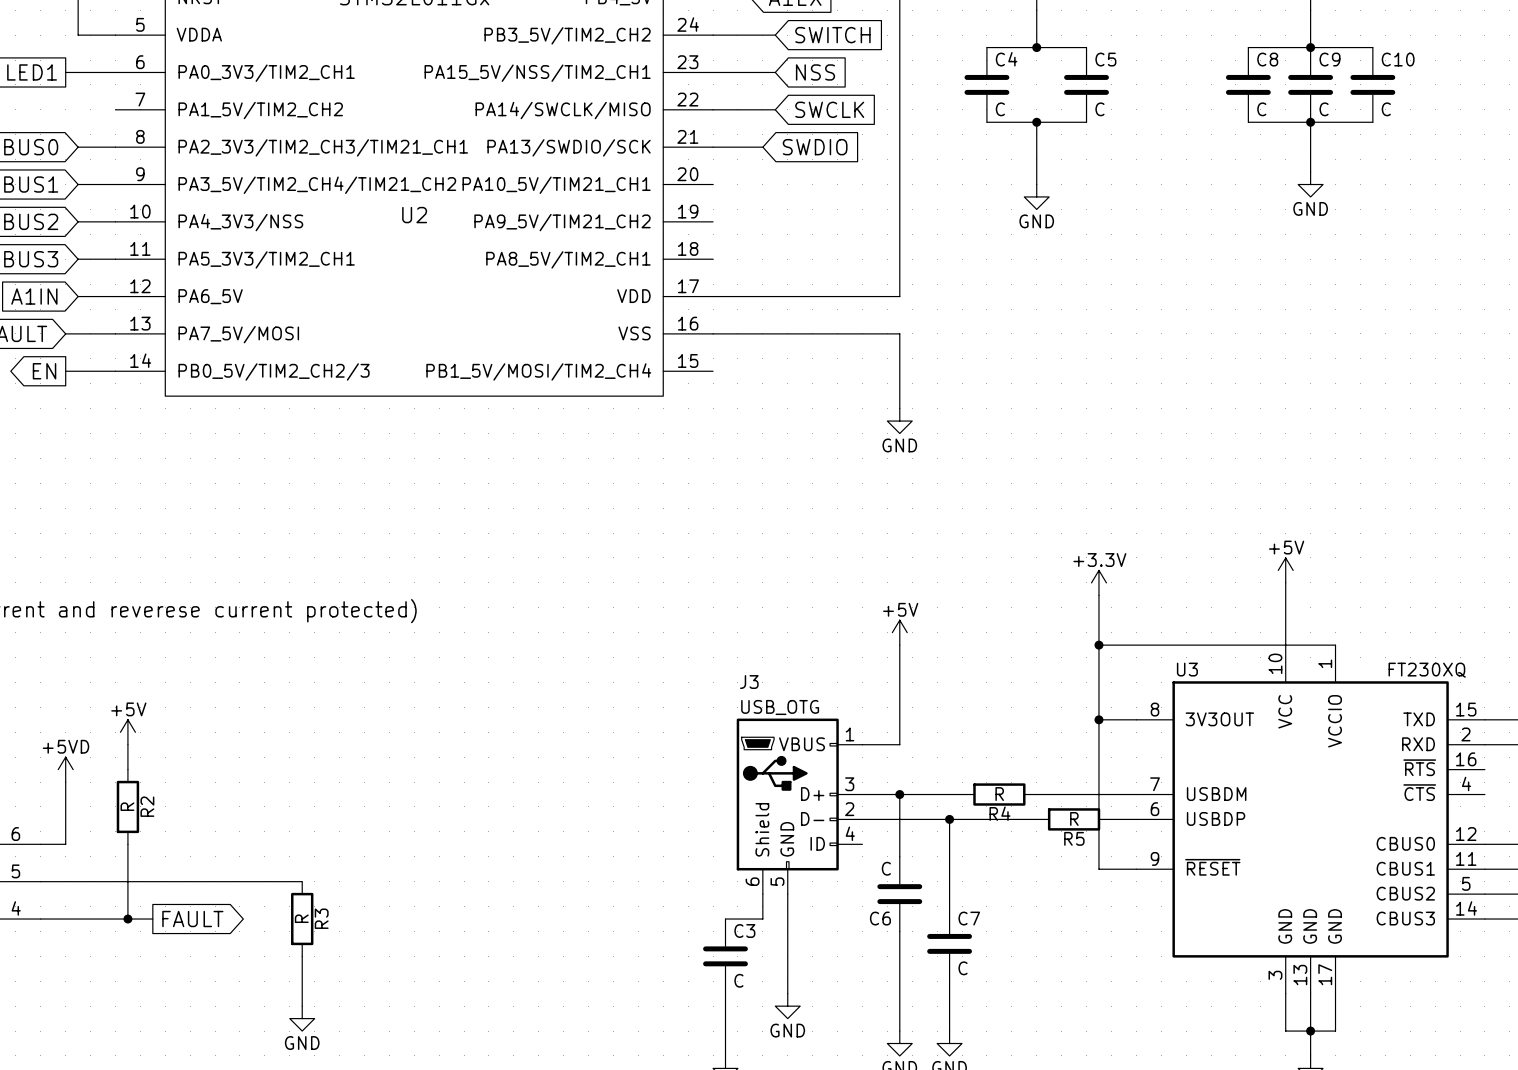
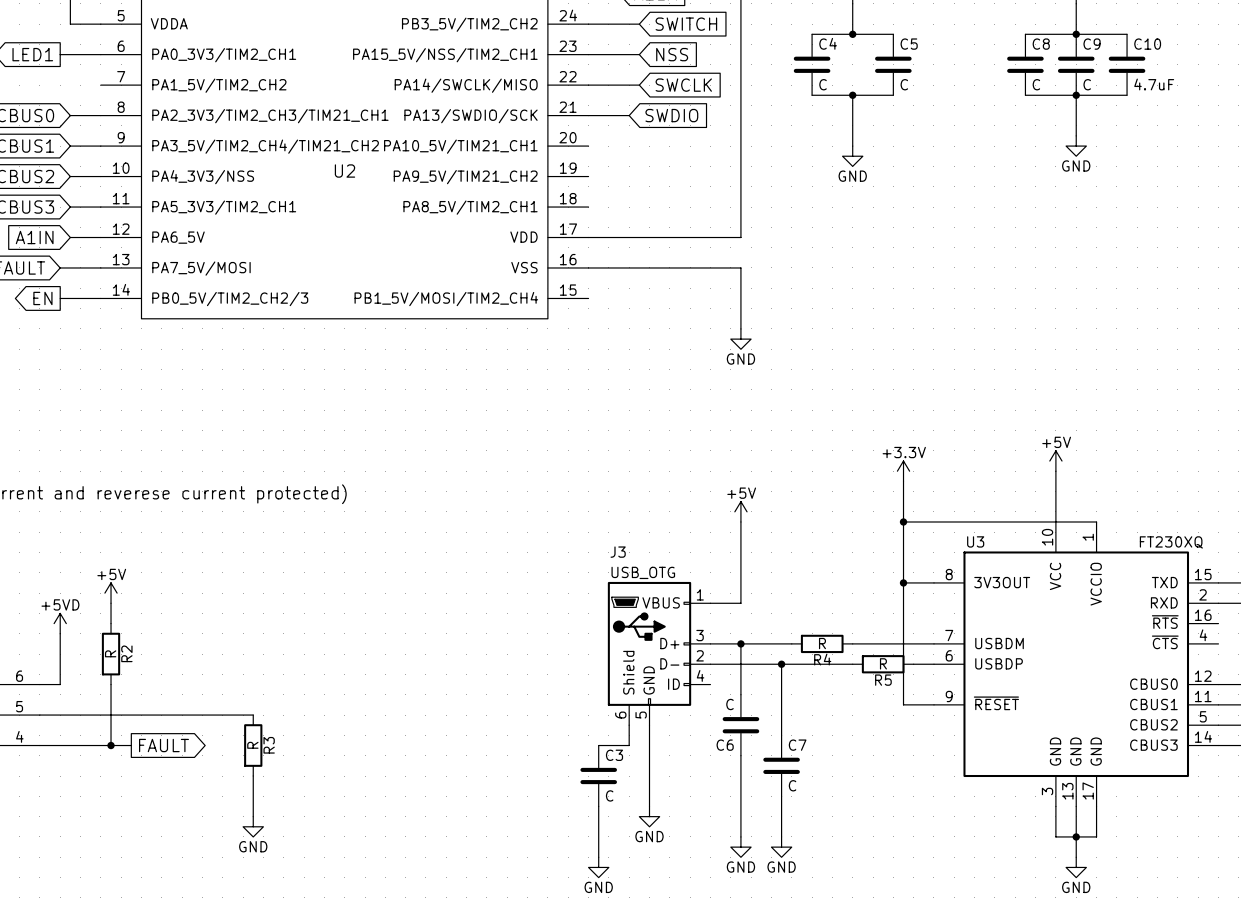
C10 value: C (1386, 109) -> 4.7uF (1154, 84)

